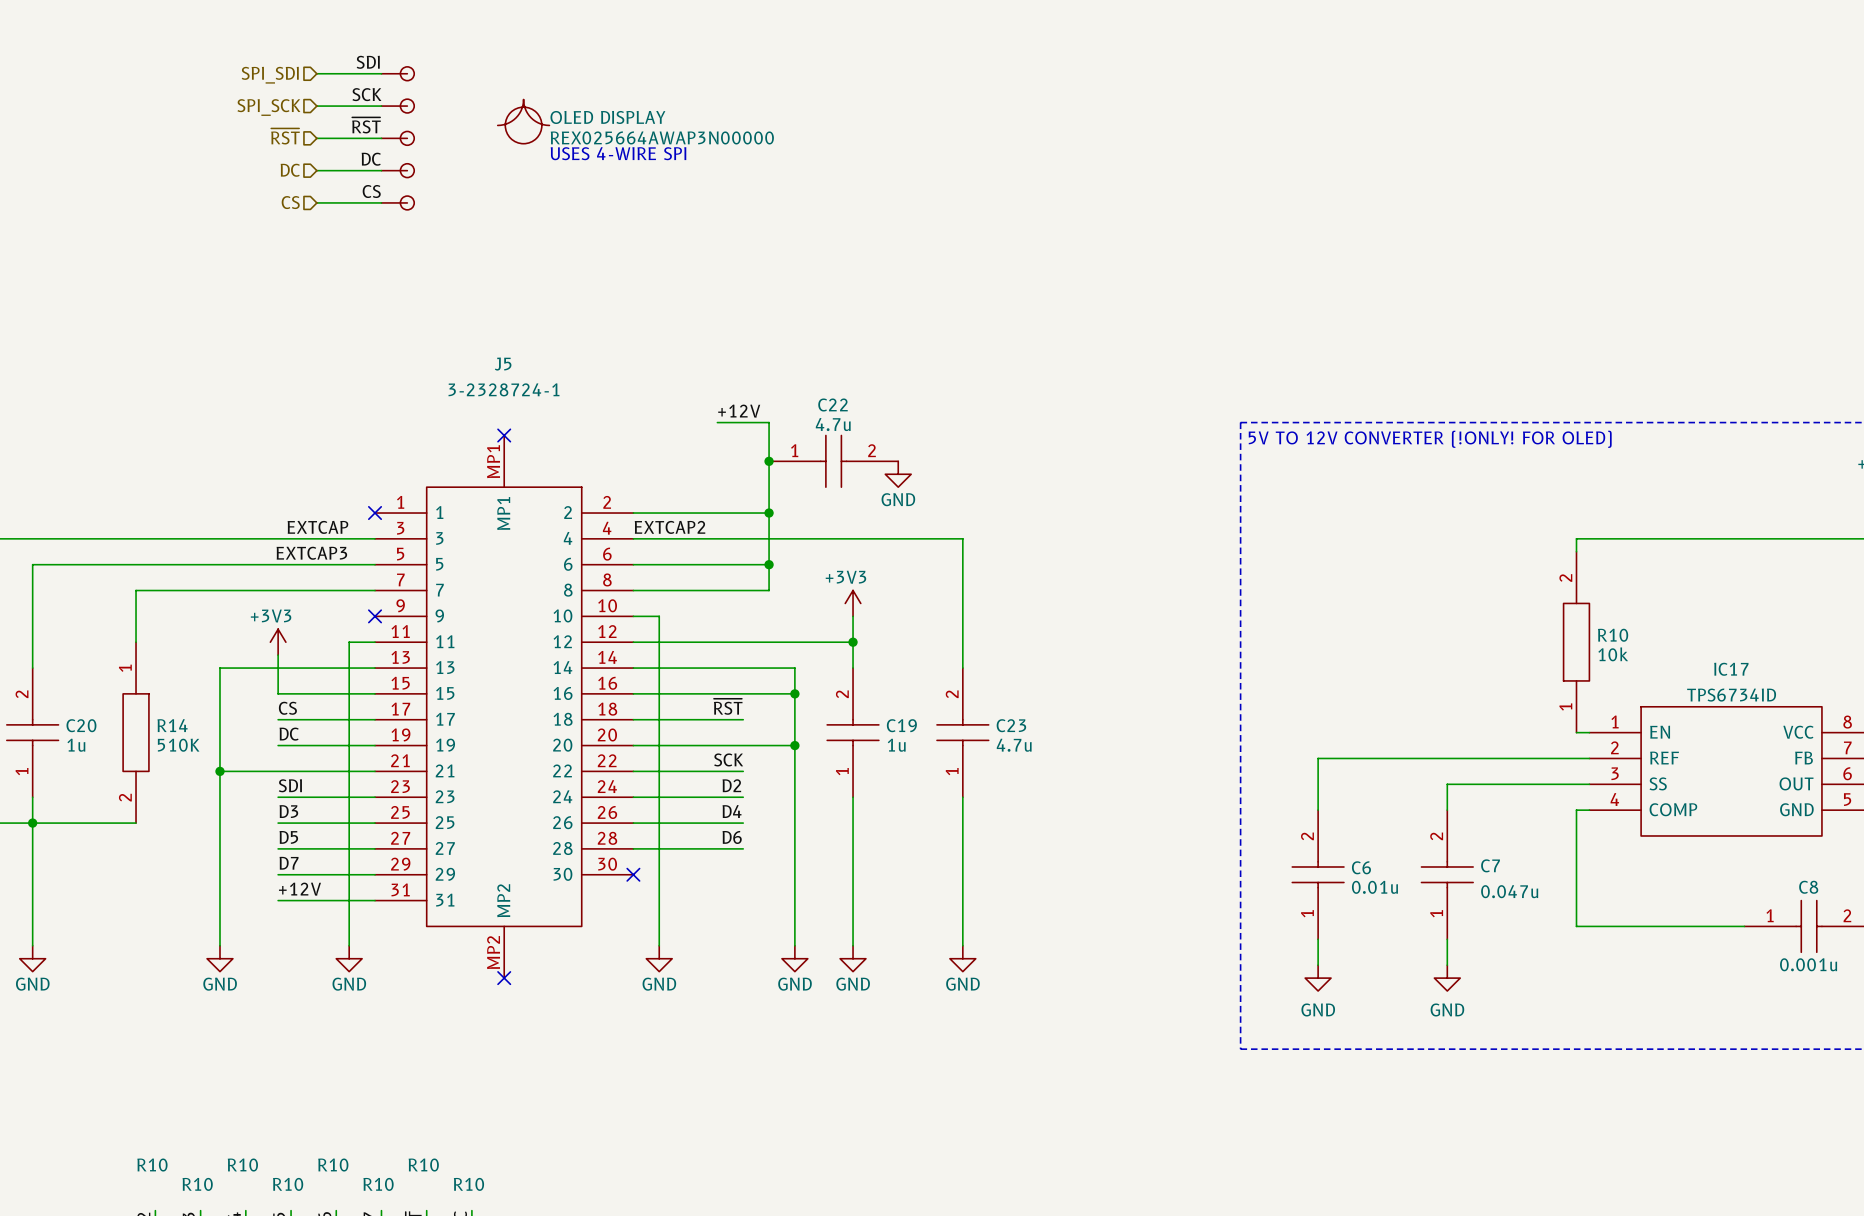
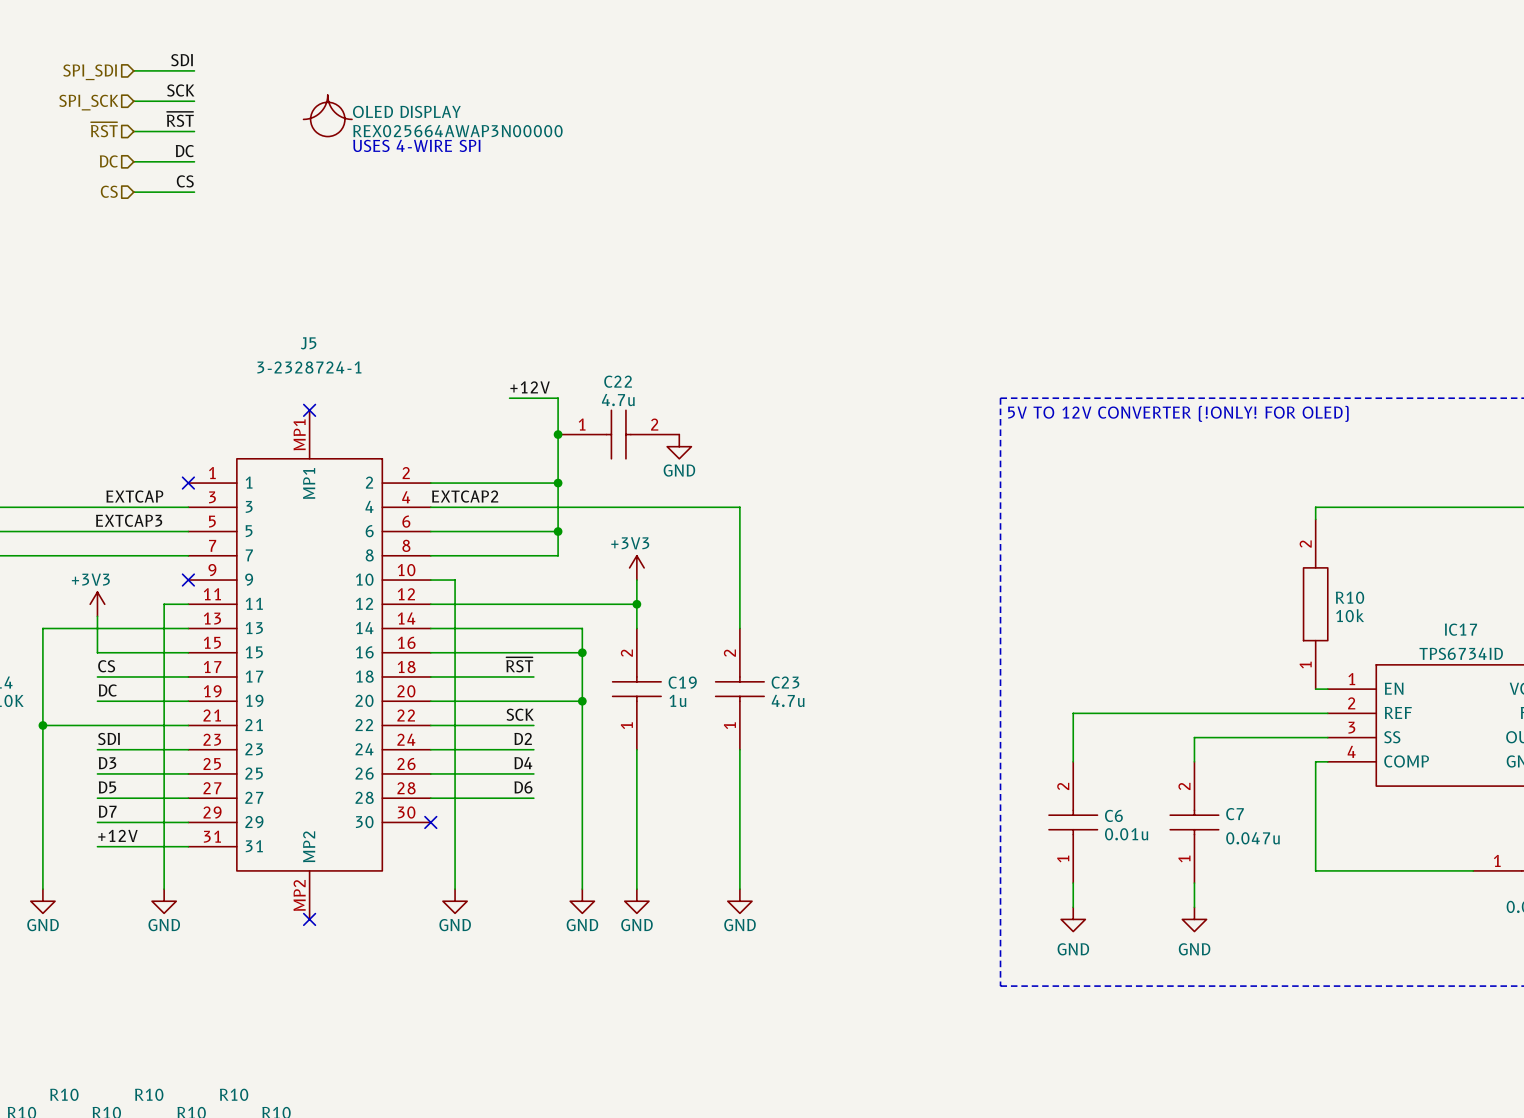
part: (397, 73) -> none
part: (397, 106) -> none
part: (397, 138) -> none
part: (397, 170) -> none
part: (397, 202) -> none

